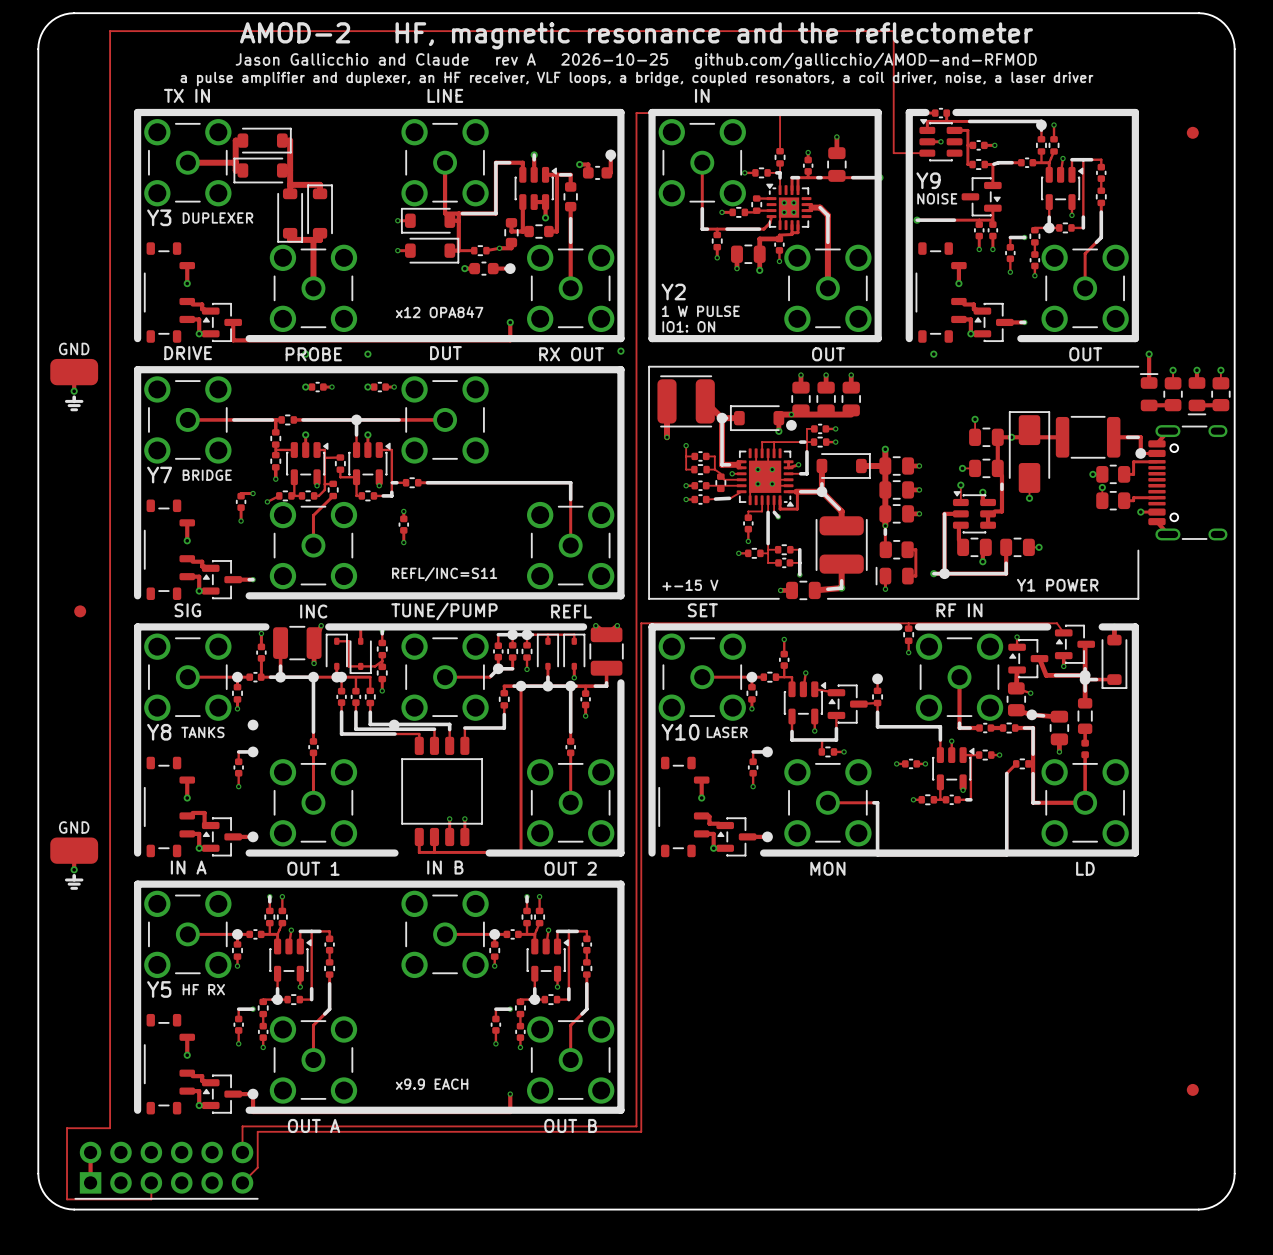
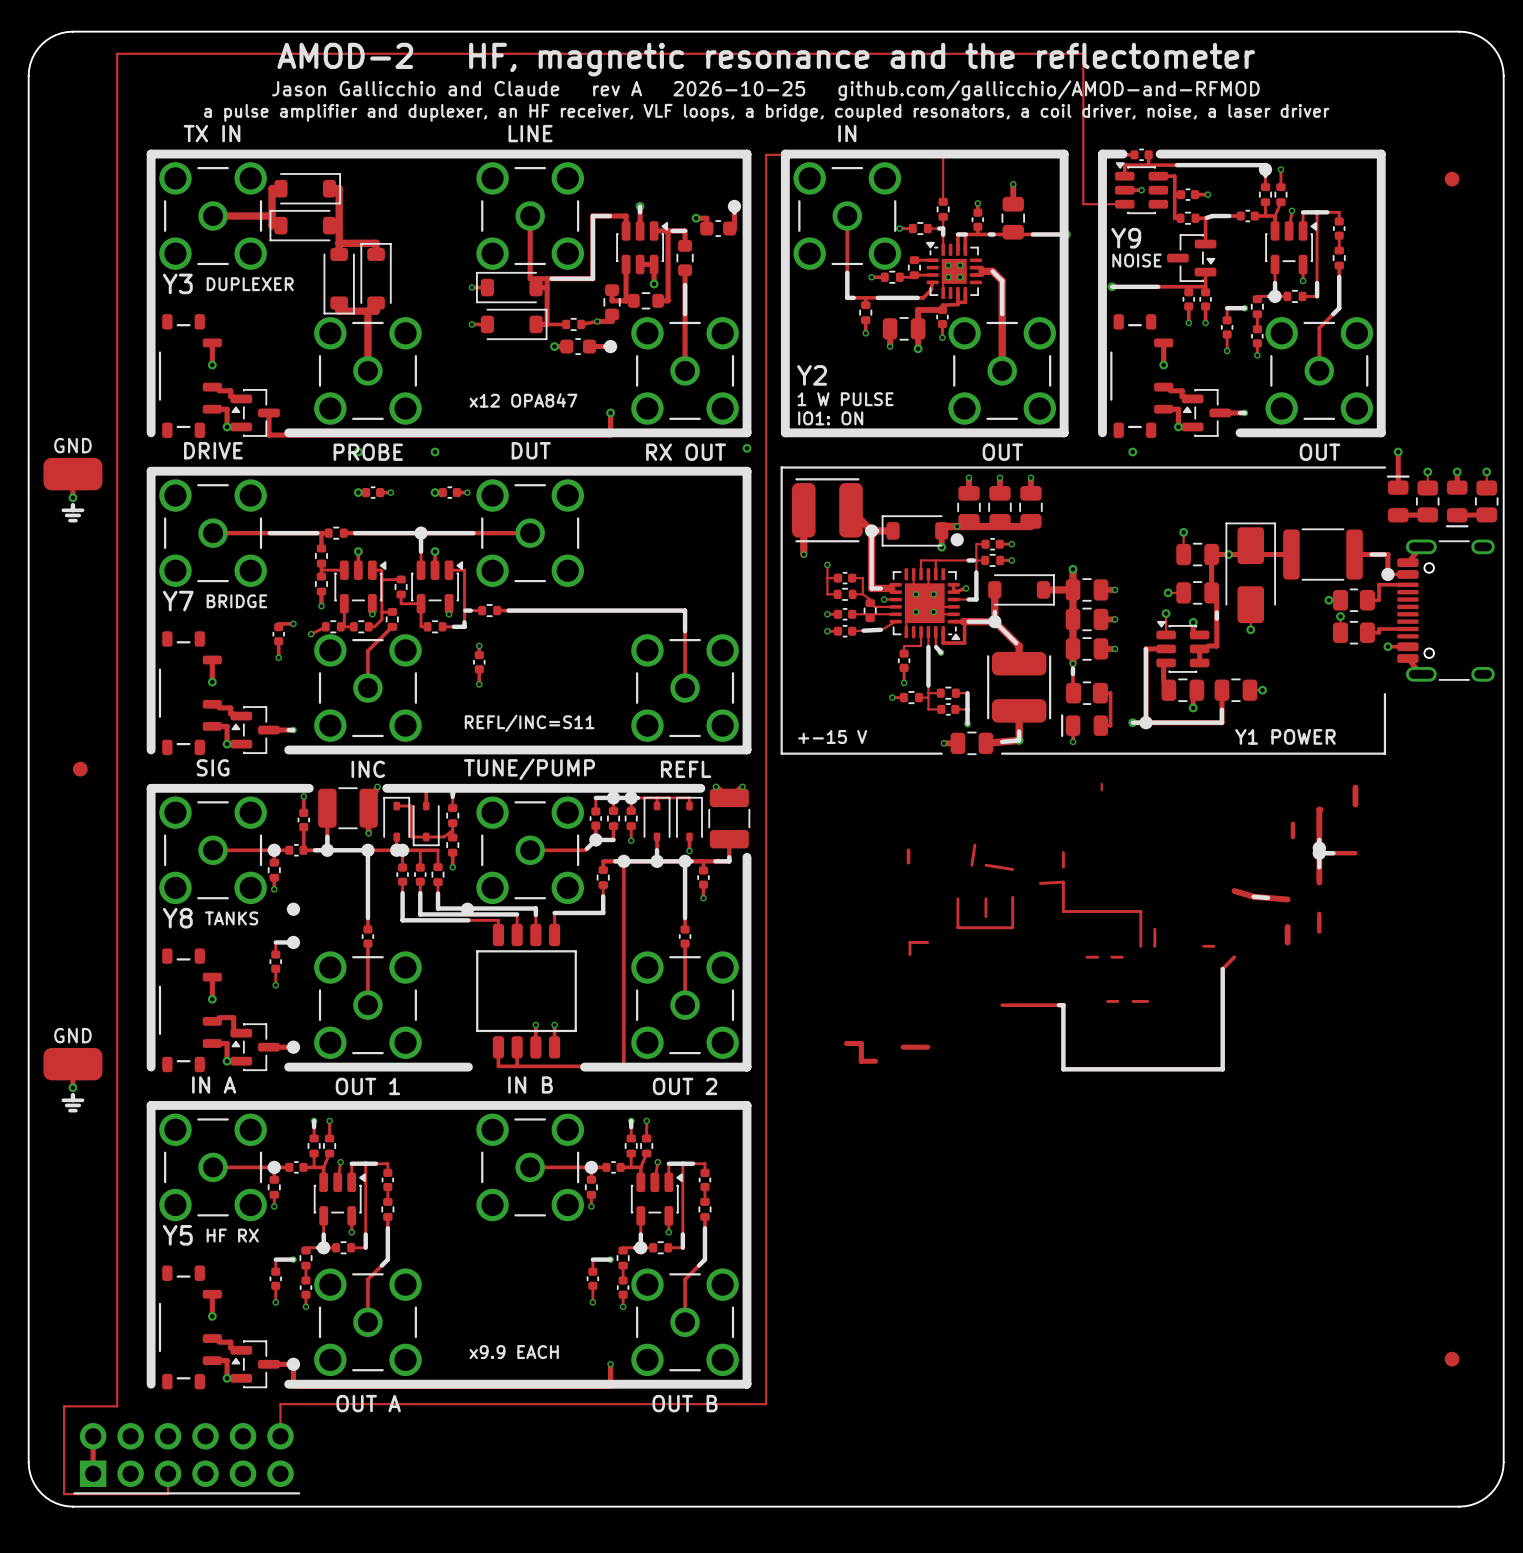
text: SET (702, 610) -> none
text: RF IN (959, 610) -> none
line: (898, 626) (652, 626) (652, 853) -> none
line: (918, 626) (1047, 626) -> none
line: (1102, 626) (1135, 626) (1135, 853) (763, 853) -> none
track: (1063, 632) (1057, 623) (641, 623) (641, 1131) (257, 1131) (257, 1167) (242, 1182) -> none
part: (908, 634) -> none
track: (1017, 637) (1017, 647) -> none
via: (1017, 637) -> none
track: (784, 639) (784, 654) -> none
via: (784, 639) -> none
track: (908, 640) (908, 652) -> none
part: (1074, 644) -> none
via: (908, 652) -> none
part: (1028, 658) -> none
track: (1039, 658) (1046, 675) (1085, 675) -> none
part: (784, 659) -> none
part: (1114, 661) -> none
track: (784, 665) (784, 677) -> none
via: (1063, 666) -> none
track: (1017, 669) (1016, 688) (1030, 693) -> none
drawing: [746, 671, 758, 683] -> none
via: (805, 672) -> none
drawing: [872, 673, 883, 685] -> none
line: (1055, 675) (1085, 675) -> none
track: (702, 677) (763, 677) -> none
part: (702, 677) -> none
part: (769, 677) -> none
track: (775, 677) (792, 677) (792, 689) -> none
track: (959, 677) (959, 728) (979, 728) -> none
part: (959, 677) -> none
part: (751, 693) -> none
via: (1030, 693) -> none
part: (877, 696) -> none
track: (751, 699) (751, 708) -> none
part: (1016, 699) -> none
part: (805, 702) -> none
part: (847, 704) -> none
via: (751, 708) -> none
drawing: [1026, 709, 1038, 721] -> none
line: (877, 712) (877, 726) (940, 726) (940, 740) -> none
part: (1085, 716) -> none
line: (959, 723) (959, 728) (970, 728) -> none
line: (836, 728) (836, 739) (792, 739) (792, 731) -> none
part: (985, 728) -> none
track: (990, 728) (1003, 728) -> none
part: (1009, 728) -> none
track: (1015, 728) (1033, 728) (1033, 802) (1085, 802) (1085, 754) -> none
line: (1024, 728) (1033, 728) (1033, 754) -> none
part: (1059, 728) -> none
via: (814, 731) -> none
text: Y10 (680, 732) -> none
text: LASER (727, 732) -> none
track: (822, 739) (821, 751) -> none
via: (951, 741) -> none
drawing: [762, 746, 773, 758] -> none
part: (1085, 748) -> none
line: (753, 751) (767, 751) -> none
part: (827, 751) -> none
track: (834, 751) (844, 751) -> none
via: (844, 751) -> none
via: (1059, 751) -> none
track: (963, 755) (979, 755) -> none
track: (970, 755) (970, 799) (957, 799) -> none
part: (985, 755) -> none
via: (999, 755) -> none
via: (896, 763) -> none
part: (911, 763) -> none
via: (925, 763) -> none
part: (1022, 763) -> none
part: (753, 767) -> none
part: (953, 768) -> none
track: (753, 773) (753, 786) -> none
line: (1033, 773) (1033, 802) (1039, 802) -> none
track: (701, 780) (701, 798) -> none
track: (940, 782) (940, 799) -> none
via: (753, 786) -> none
via: (963, 790) -> none
via: (701, 798) -> none
via: (913, 799) -> none
part: (927, 799) -> none
part: (951, 799) -> none
line: (966, 799) (970, 799) -> none
part: (827, 802) -> none
part: (1085, 802) -> none
part: (683, 806) -> none
track: (707, 816) (709, 816) (709, 823) (719, 823) -> none
drawing: [762, 831, 773, 843] -> none
part: (736, 836) -> none
via: (713, 848) -> none
text: MON (827, 868) -> none
text: LD (1085, 868) -> none

